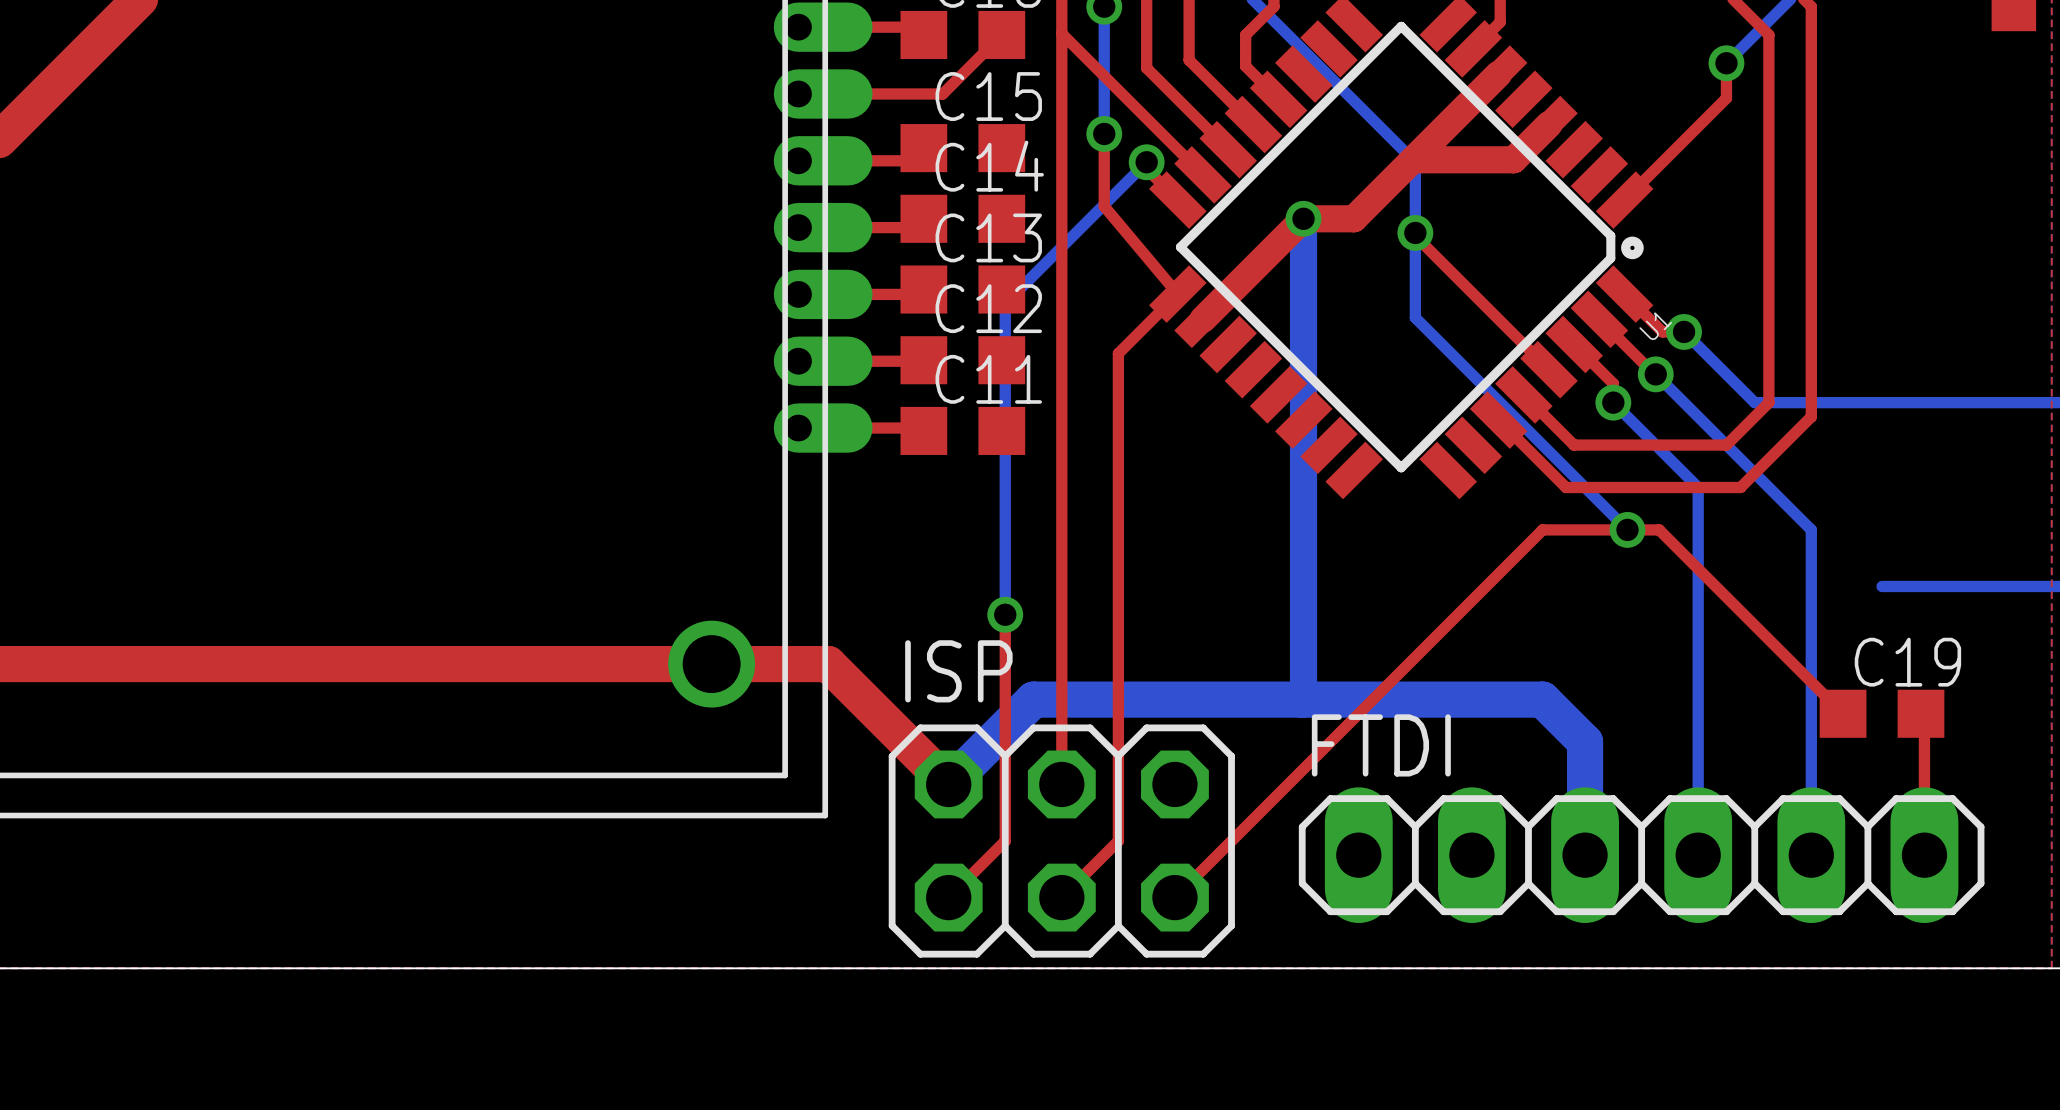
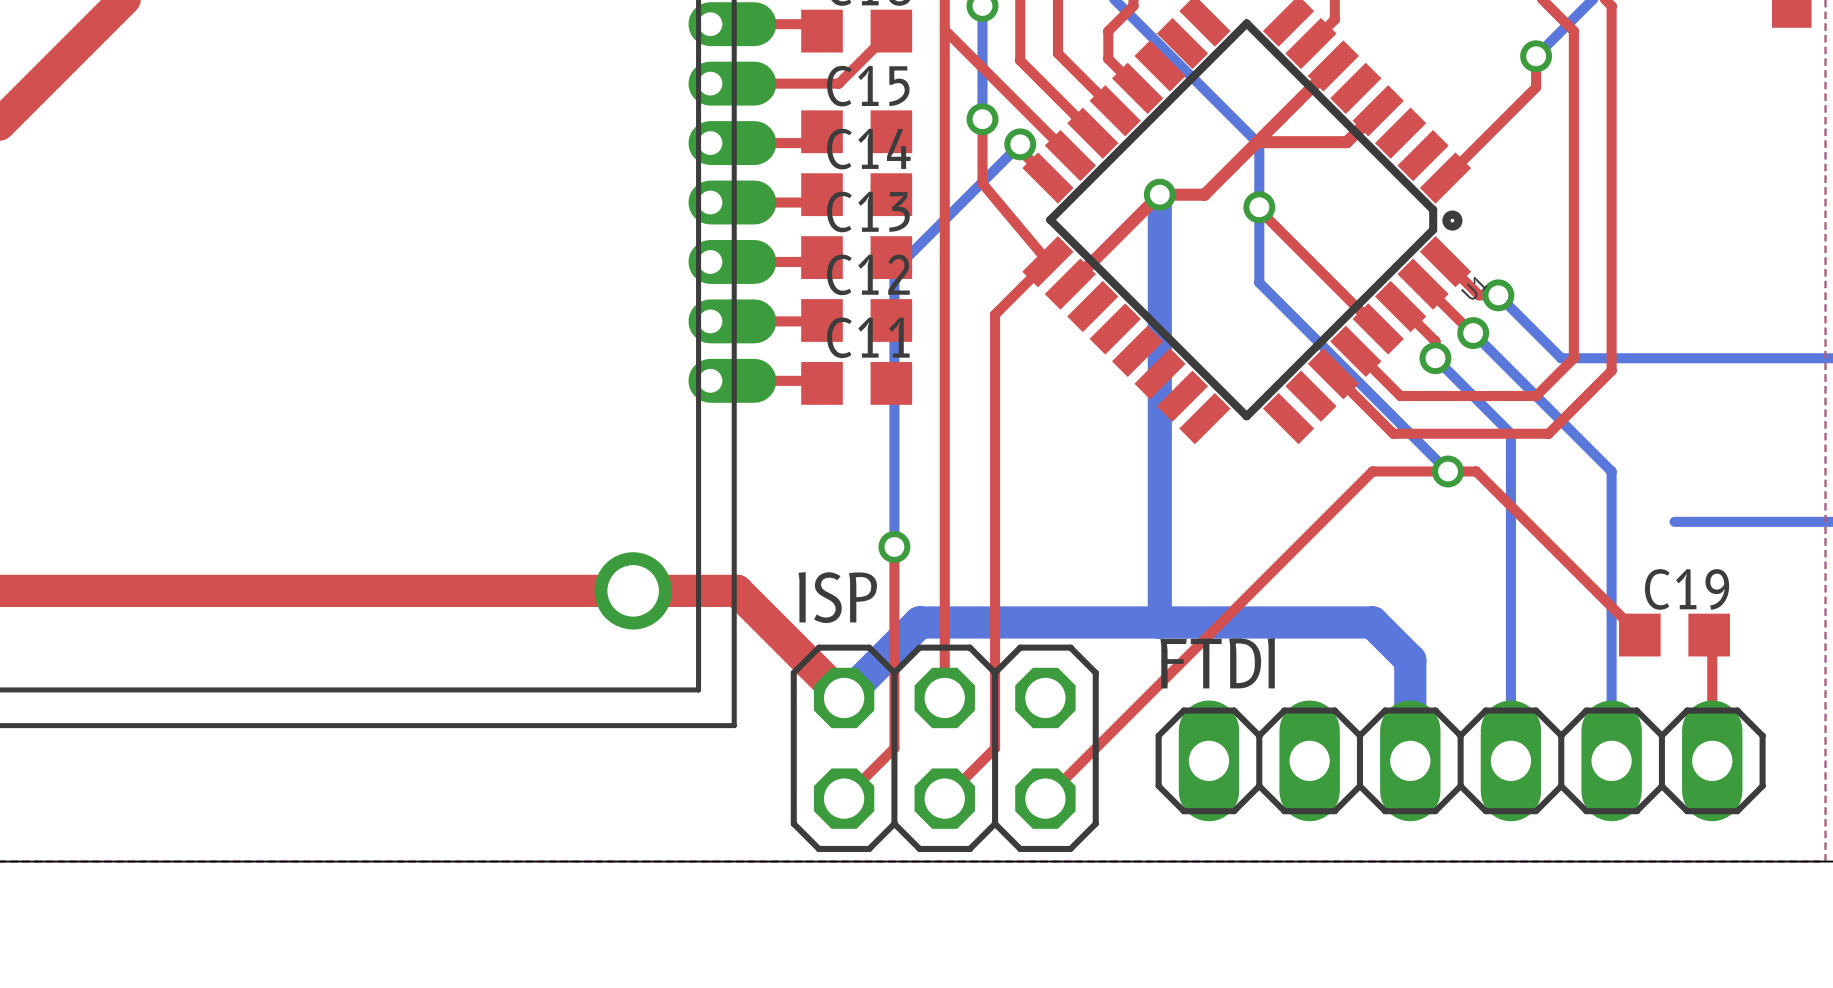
top track width: thick (1498, 74) (1353, 218) (1303, 218) (1203, 319) -> thin (1333, 65) (1204, 194) (1159, 194) (1070, 284)
top track width: thick (1549, 124) (1513, 159) (1412, 159) -> thin (1378, 110) (1346, 142) (1257, 142)

